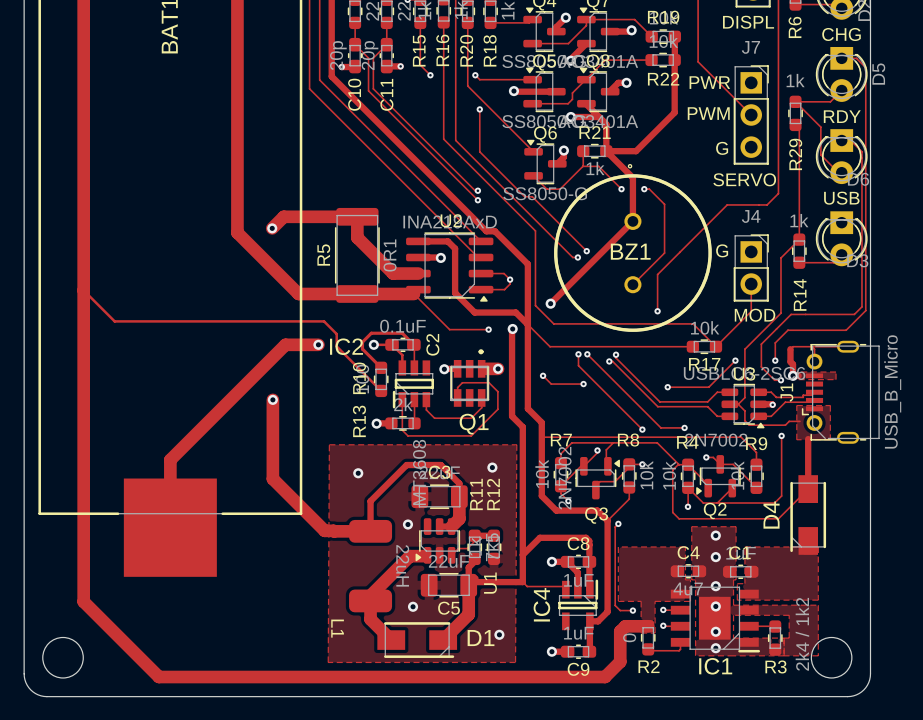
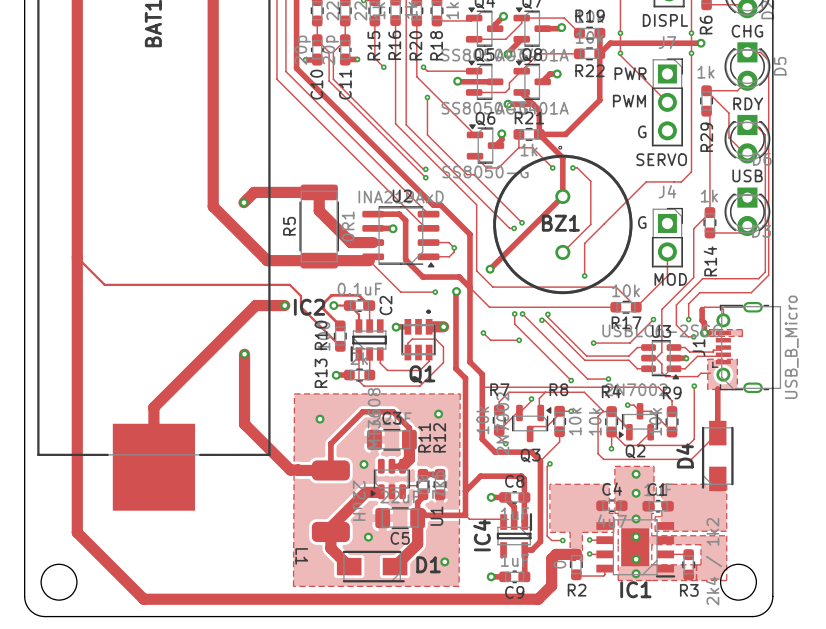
via: none -> (620, 33)
via: none -> (691, 33)
track: none -> (700, 43) (610, 43) (599, 53)
via: none -> (700, 43)
via: none -> (620, 53)
via: none -> (691, 53)

